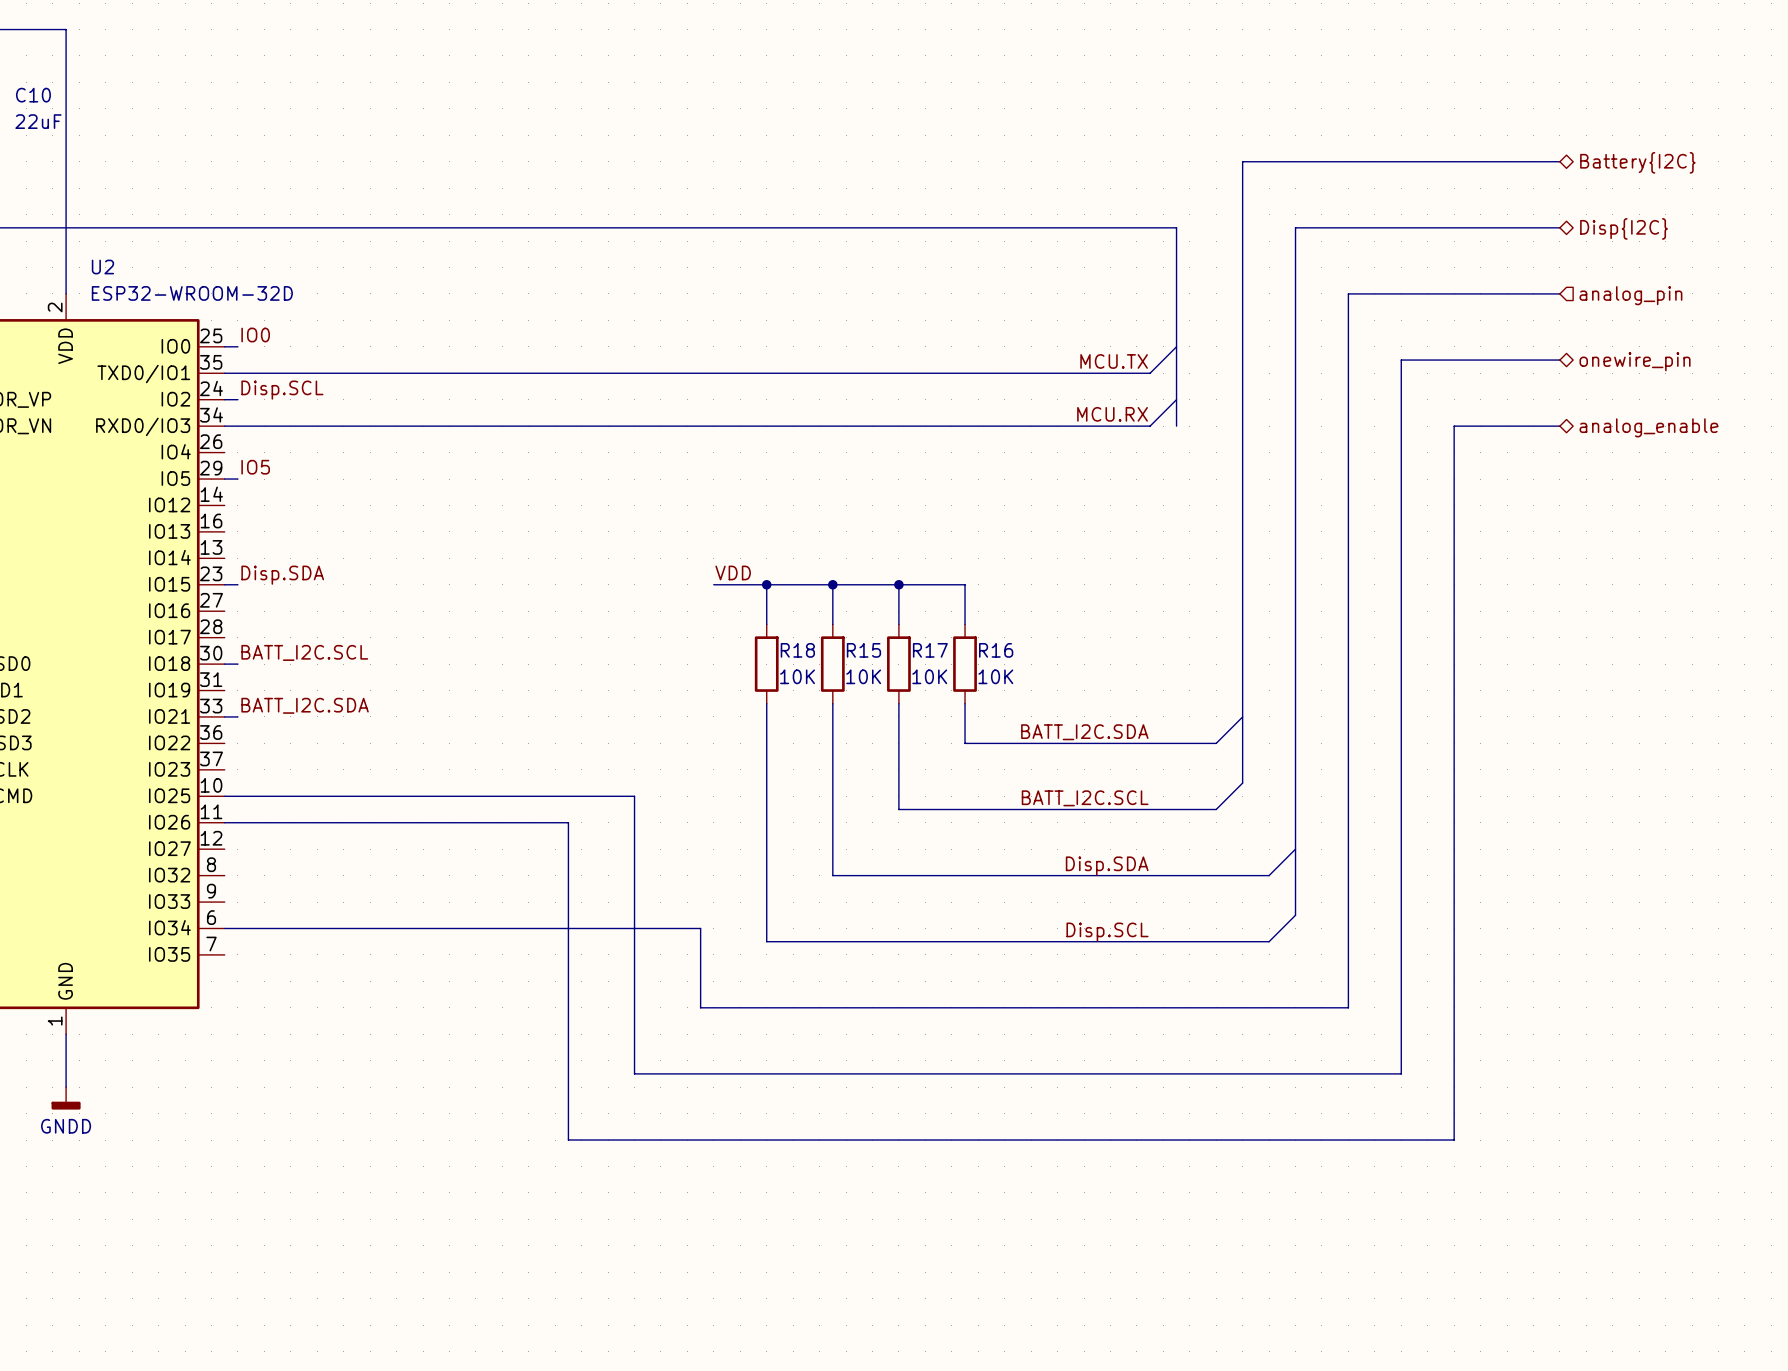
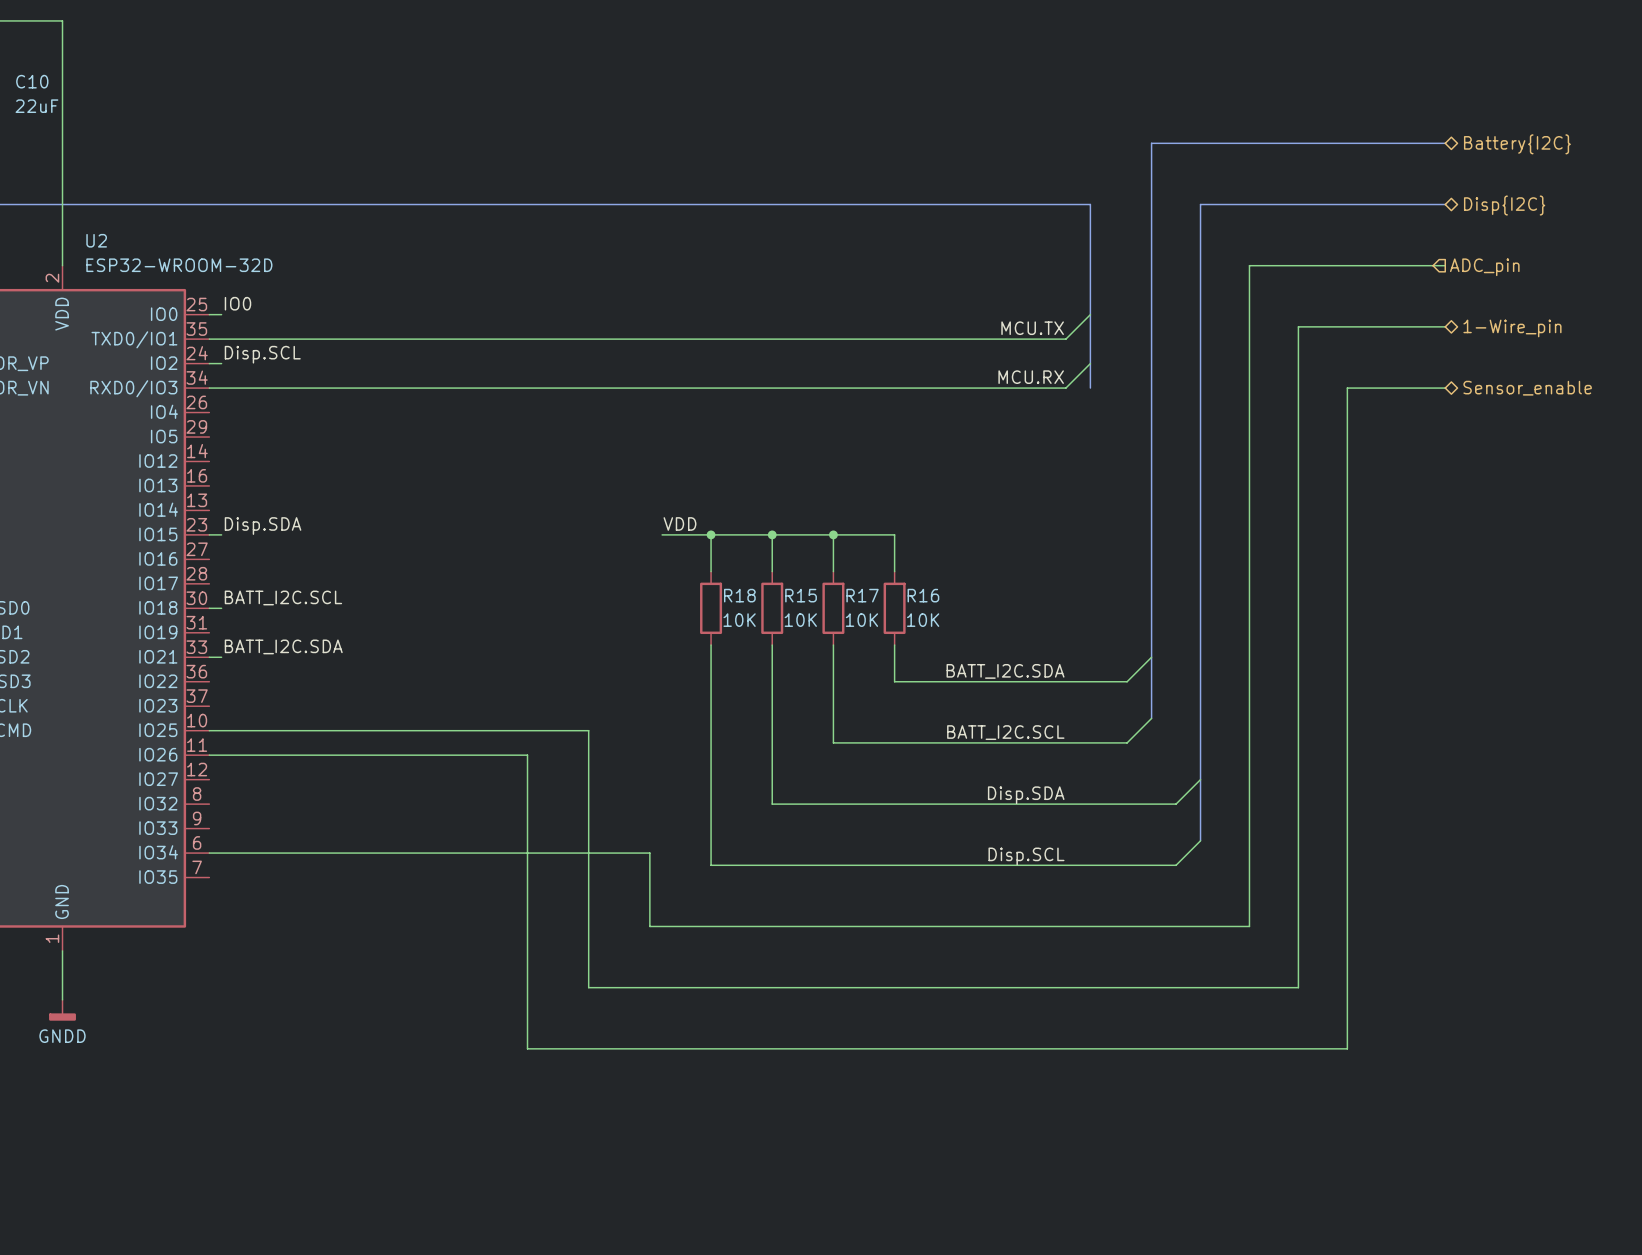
hierarchical label: none -> ADC_pin (1484, 267)
hierarchical label: analog_pin (1630, 295) -> none
hierarchical label: onewire_pin (1635, 361) -> 1-Wire_pin (1512, 328)
hierarchical label: analog_enable (1648, 427) -> Sensor_enable (1527, 388)
label: IO5 (255, 467) -> none
wire: (224, 479) (237, 479) -> none

